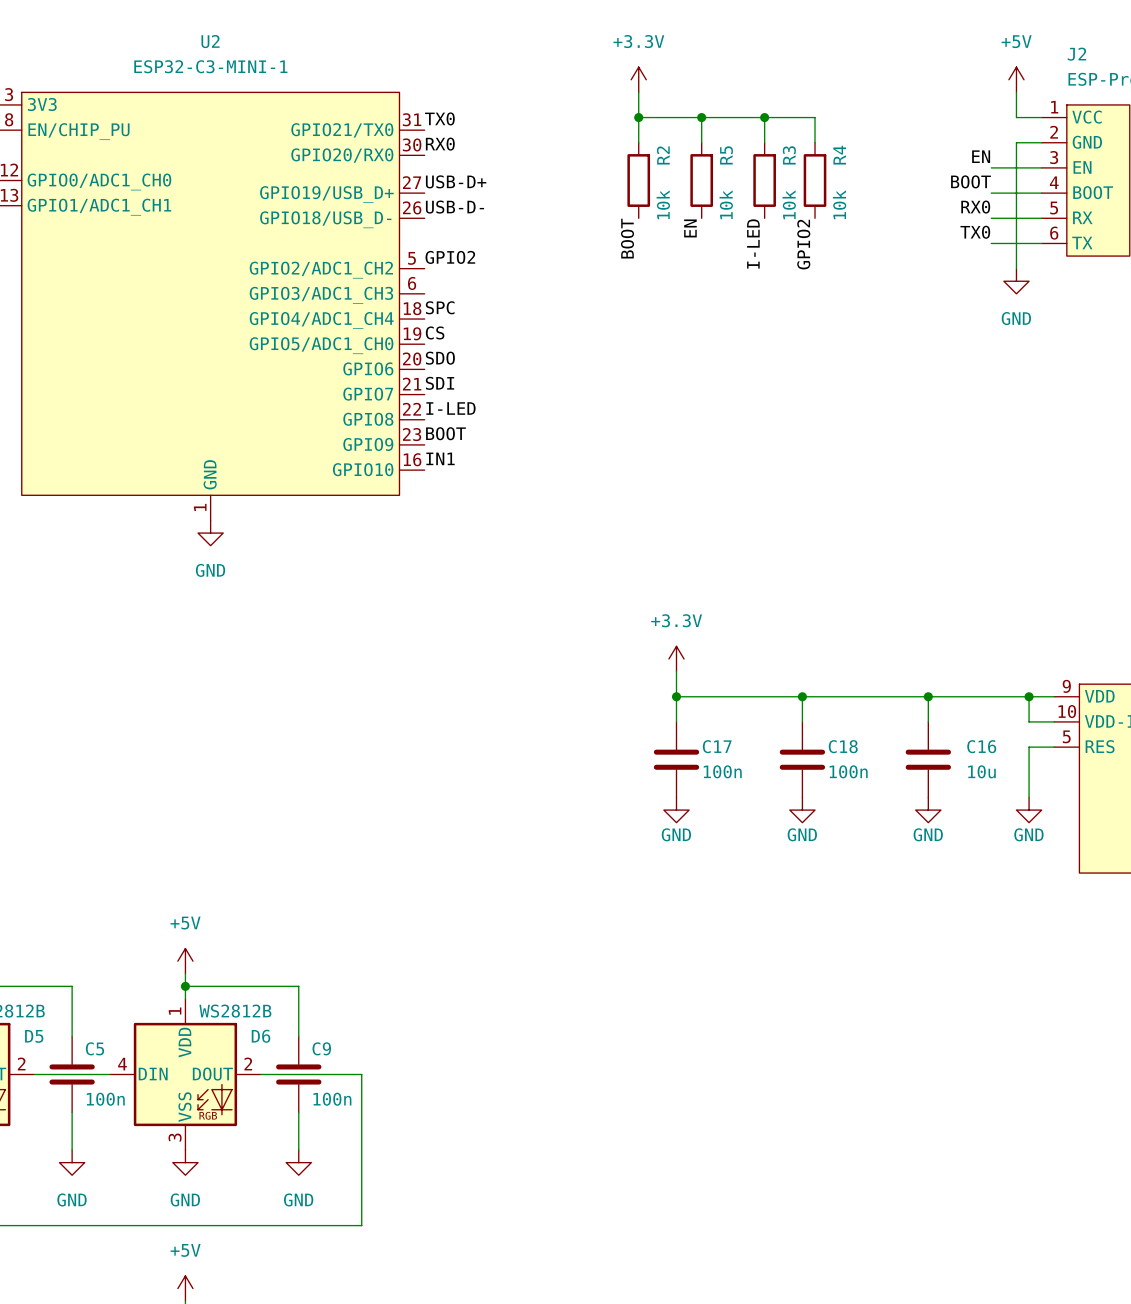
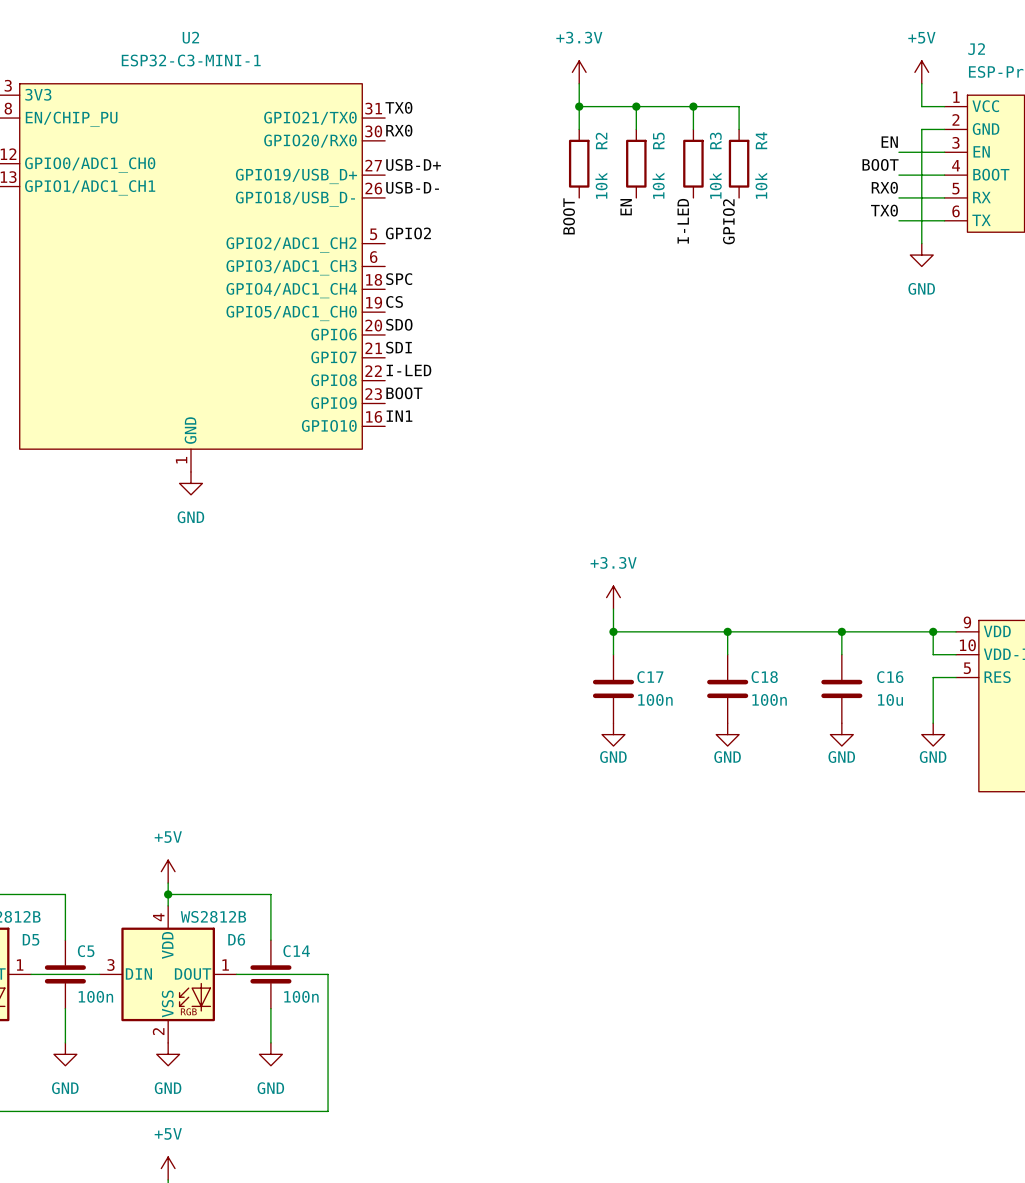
D6 pin number: 1 (175, 1011) -> 4 (158, 917)
C9 name: C9 (321, 1048) -> C14 (296, 951)
D5 pin number: 2 (21, 1064) -> 1 (20, 964)
D6 pin number: 4 (122, 1064) -> 3 (111, 965)
D6 pin number: 2 (248, 1064) -> 1 (225, 964)
D6 pin number: 3 (175, 1137) -> 2 (158, 1031)

